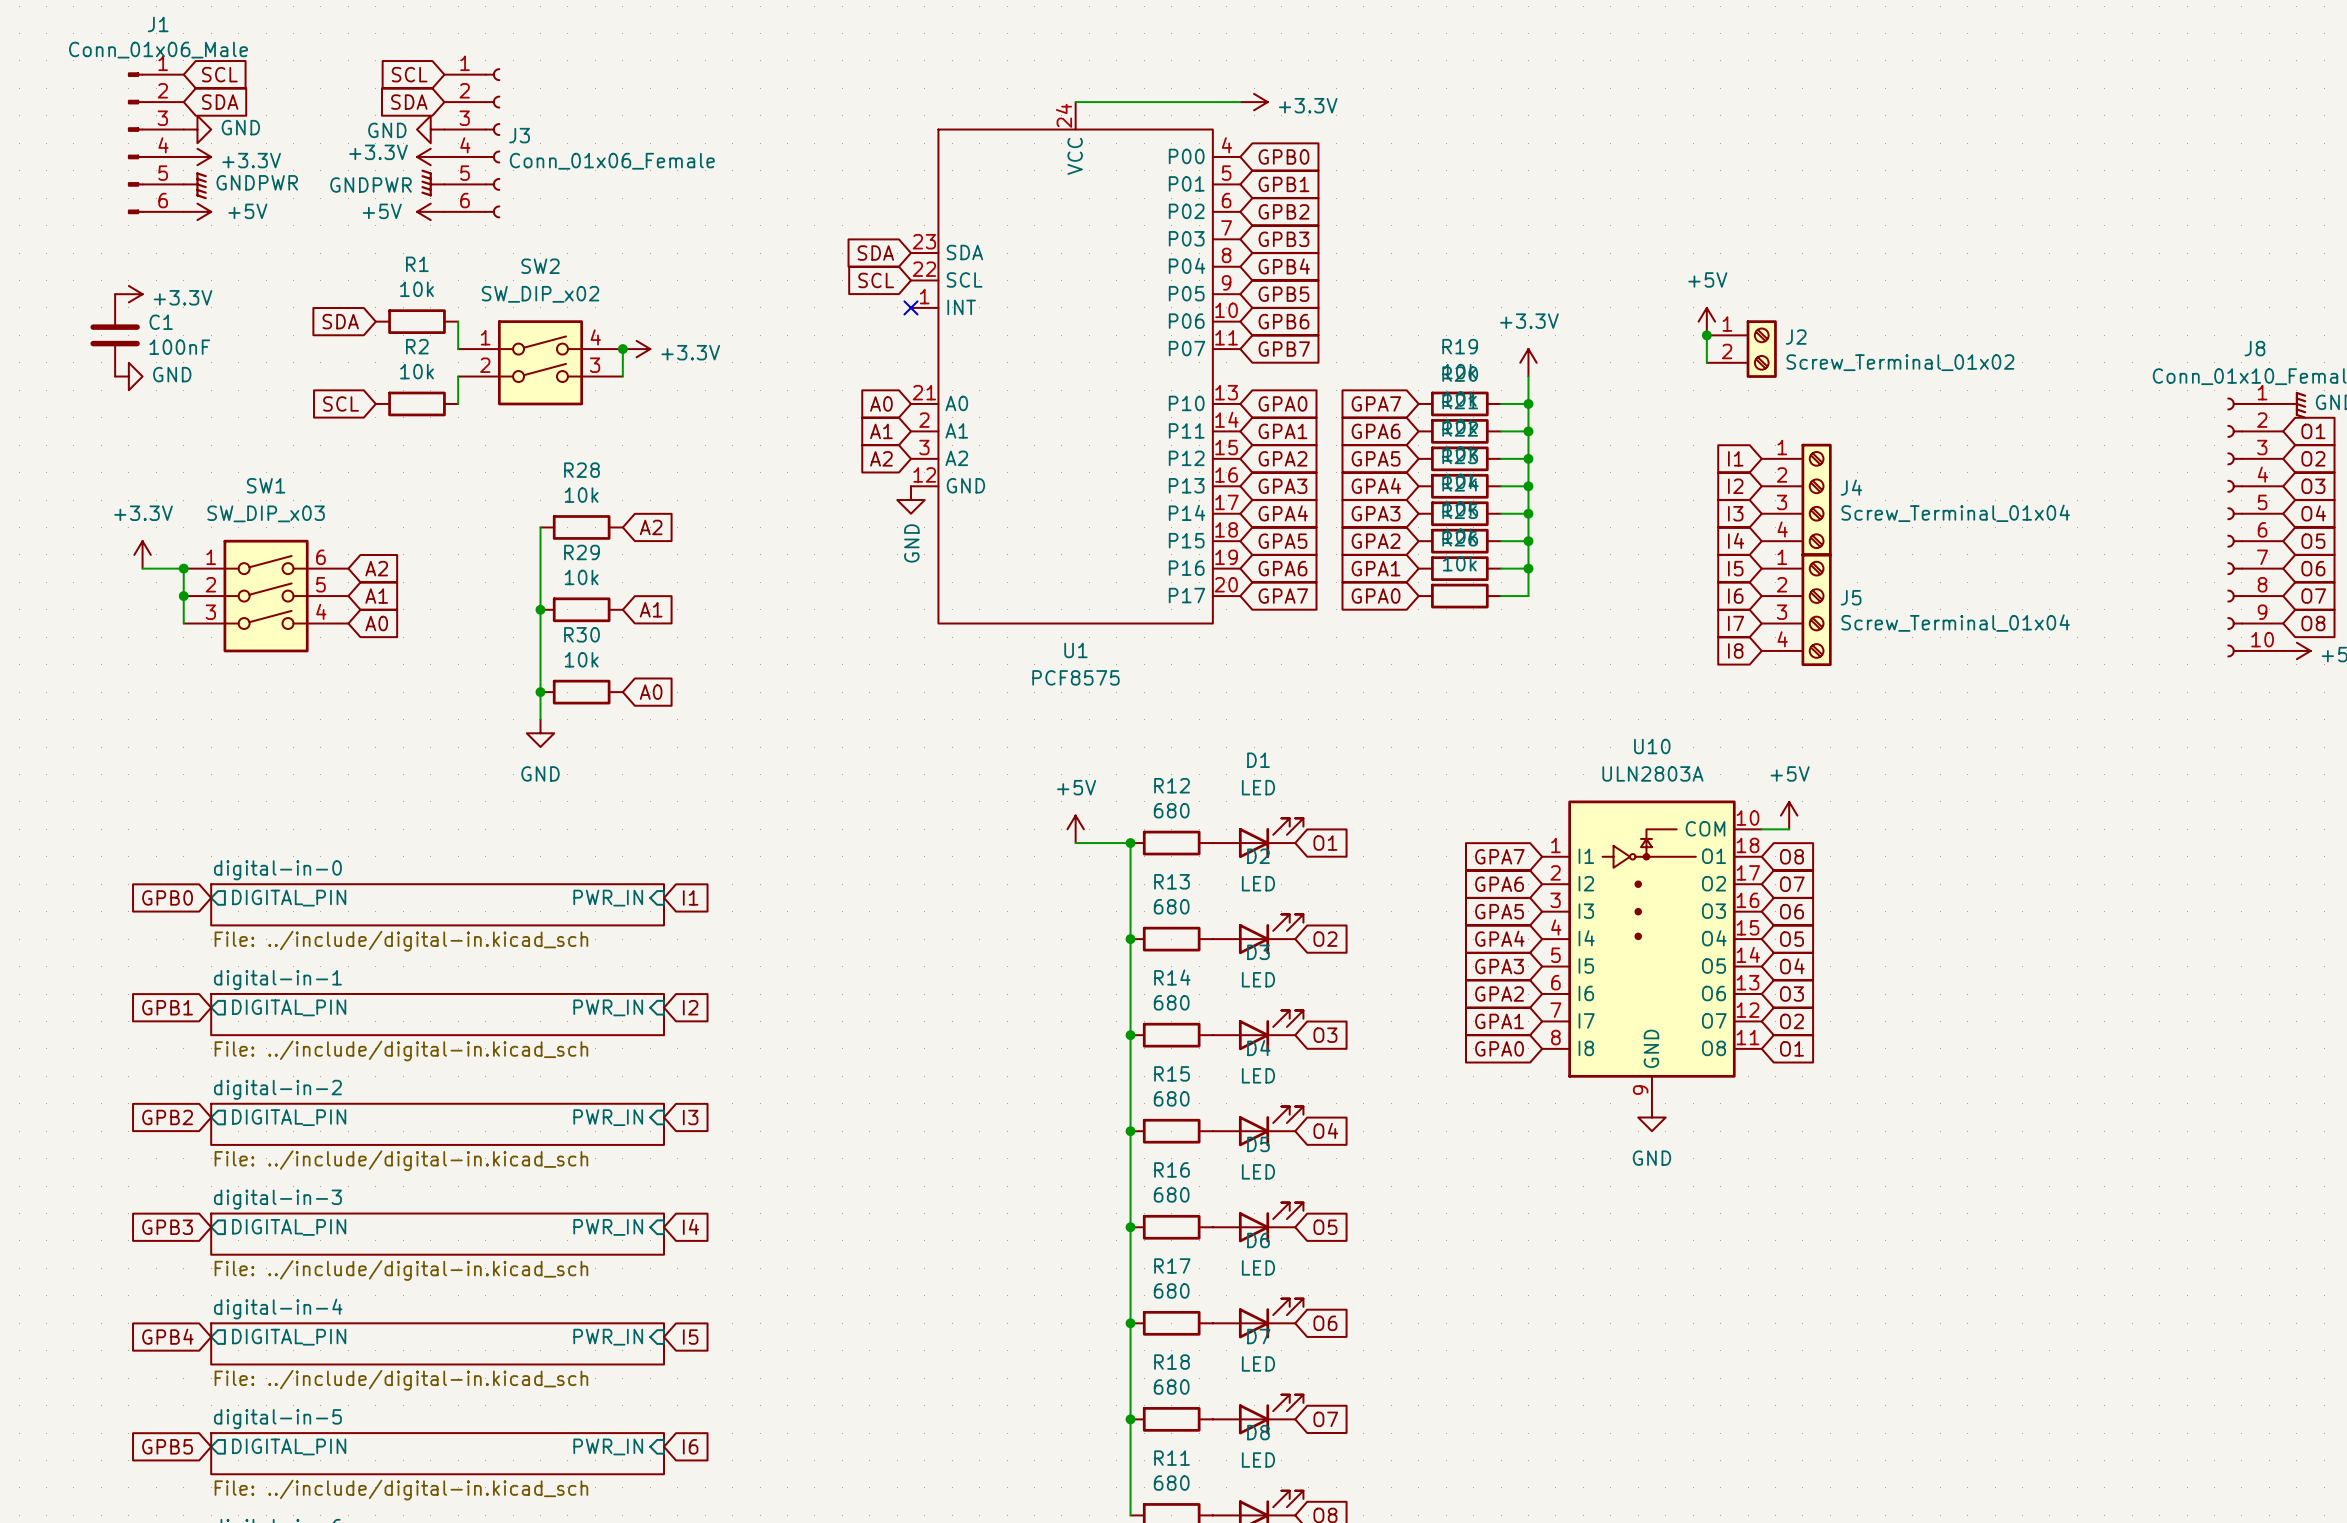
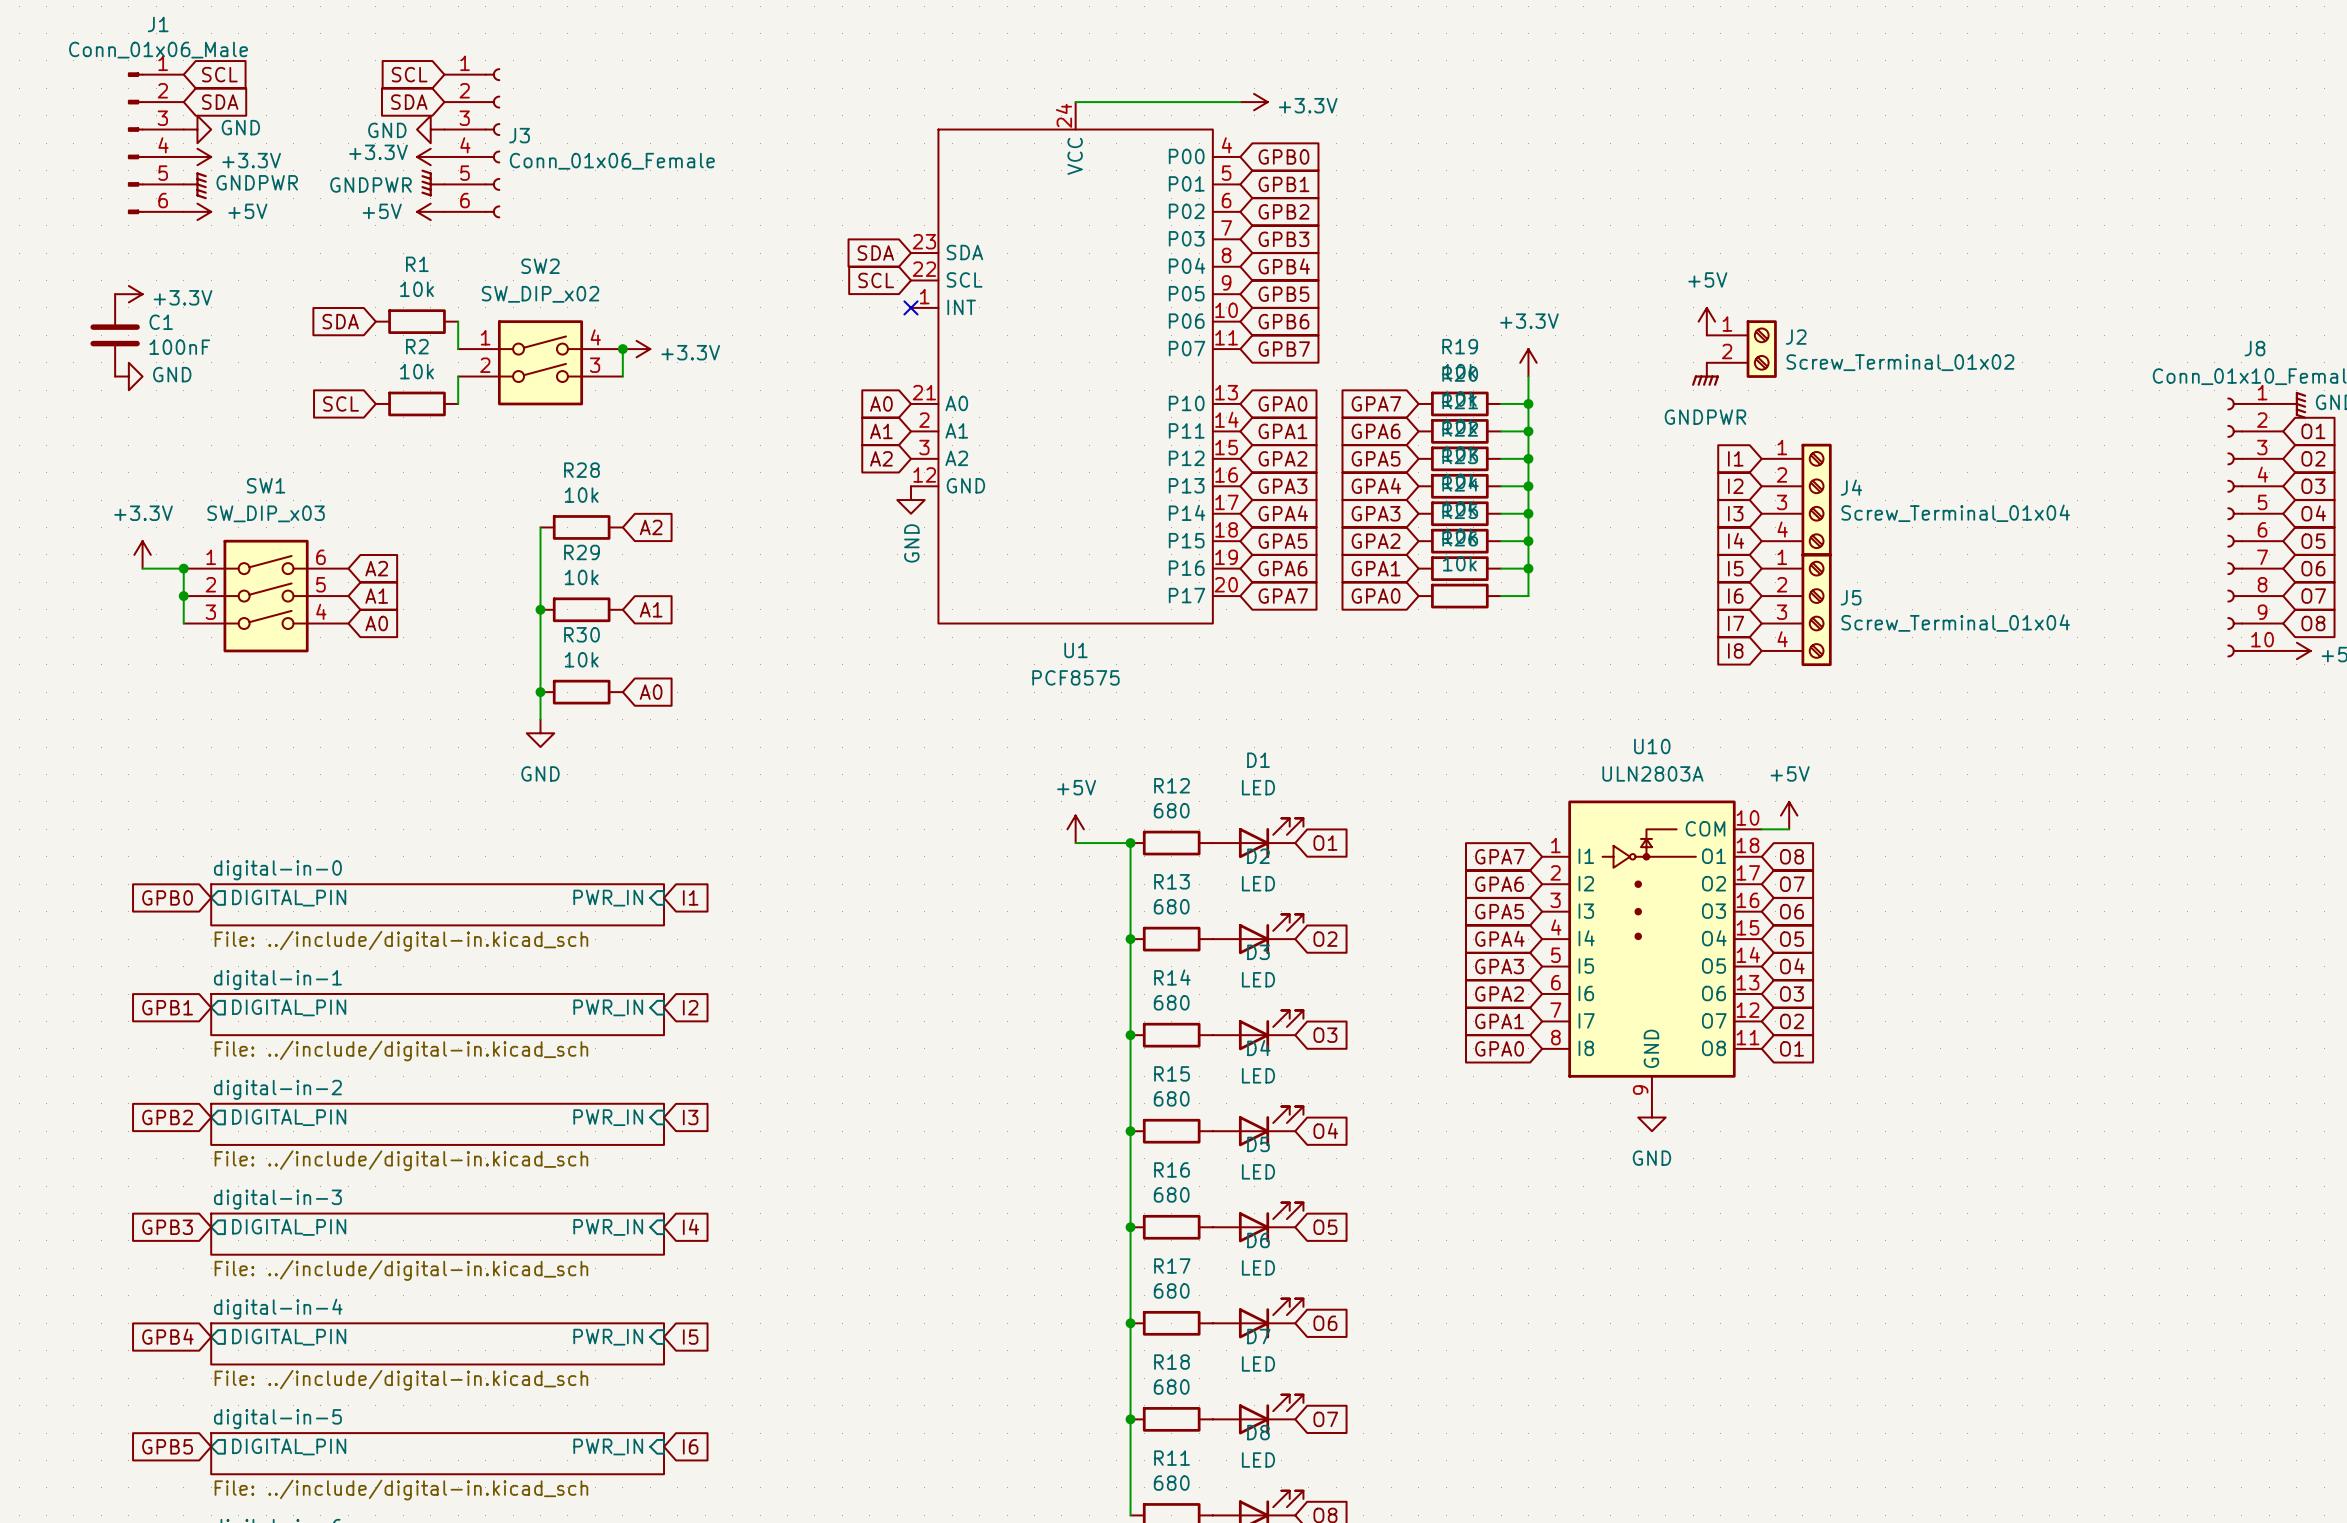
wire: (1706, 335) (1706, 362) -> none
junction: (1706, 335) -> none
power symbol: none -> GNDPWR (1705, 374)

